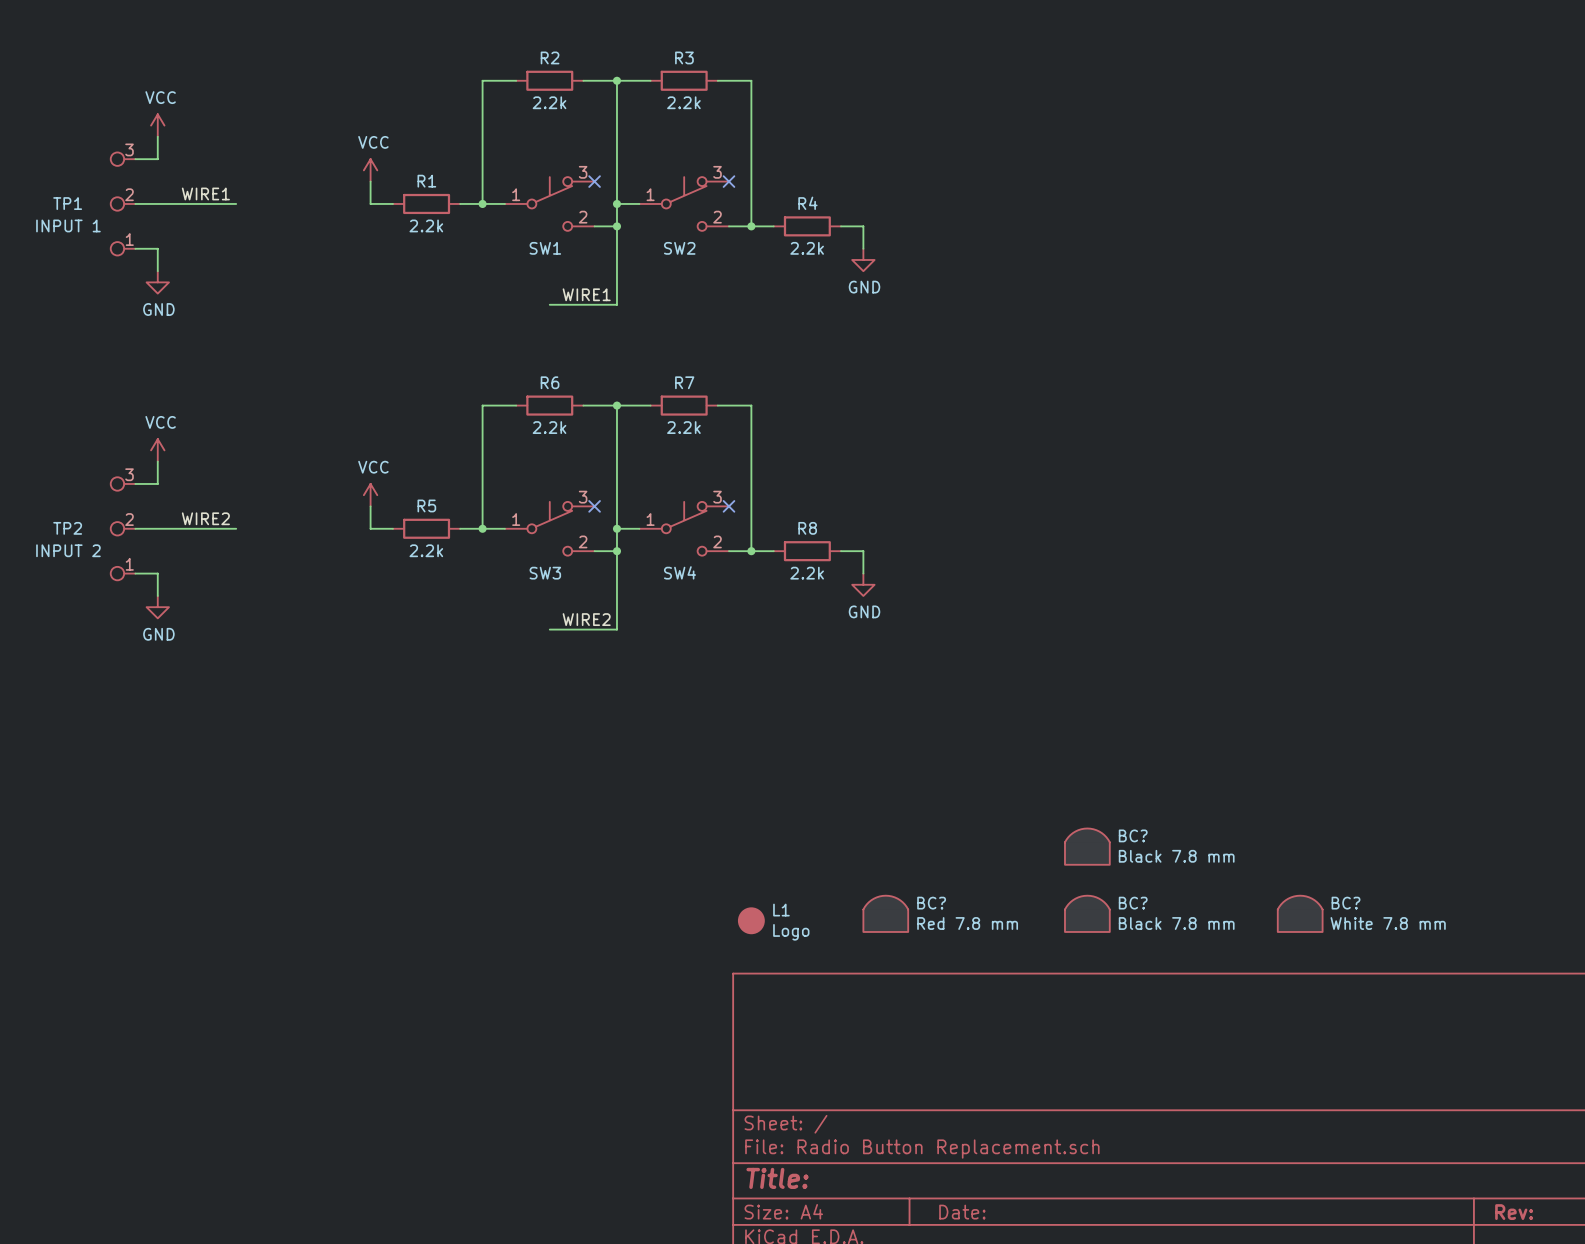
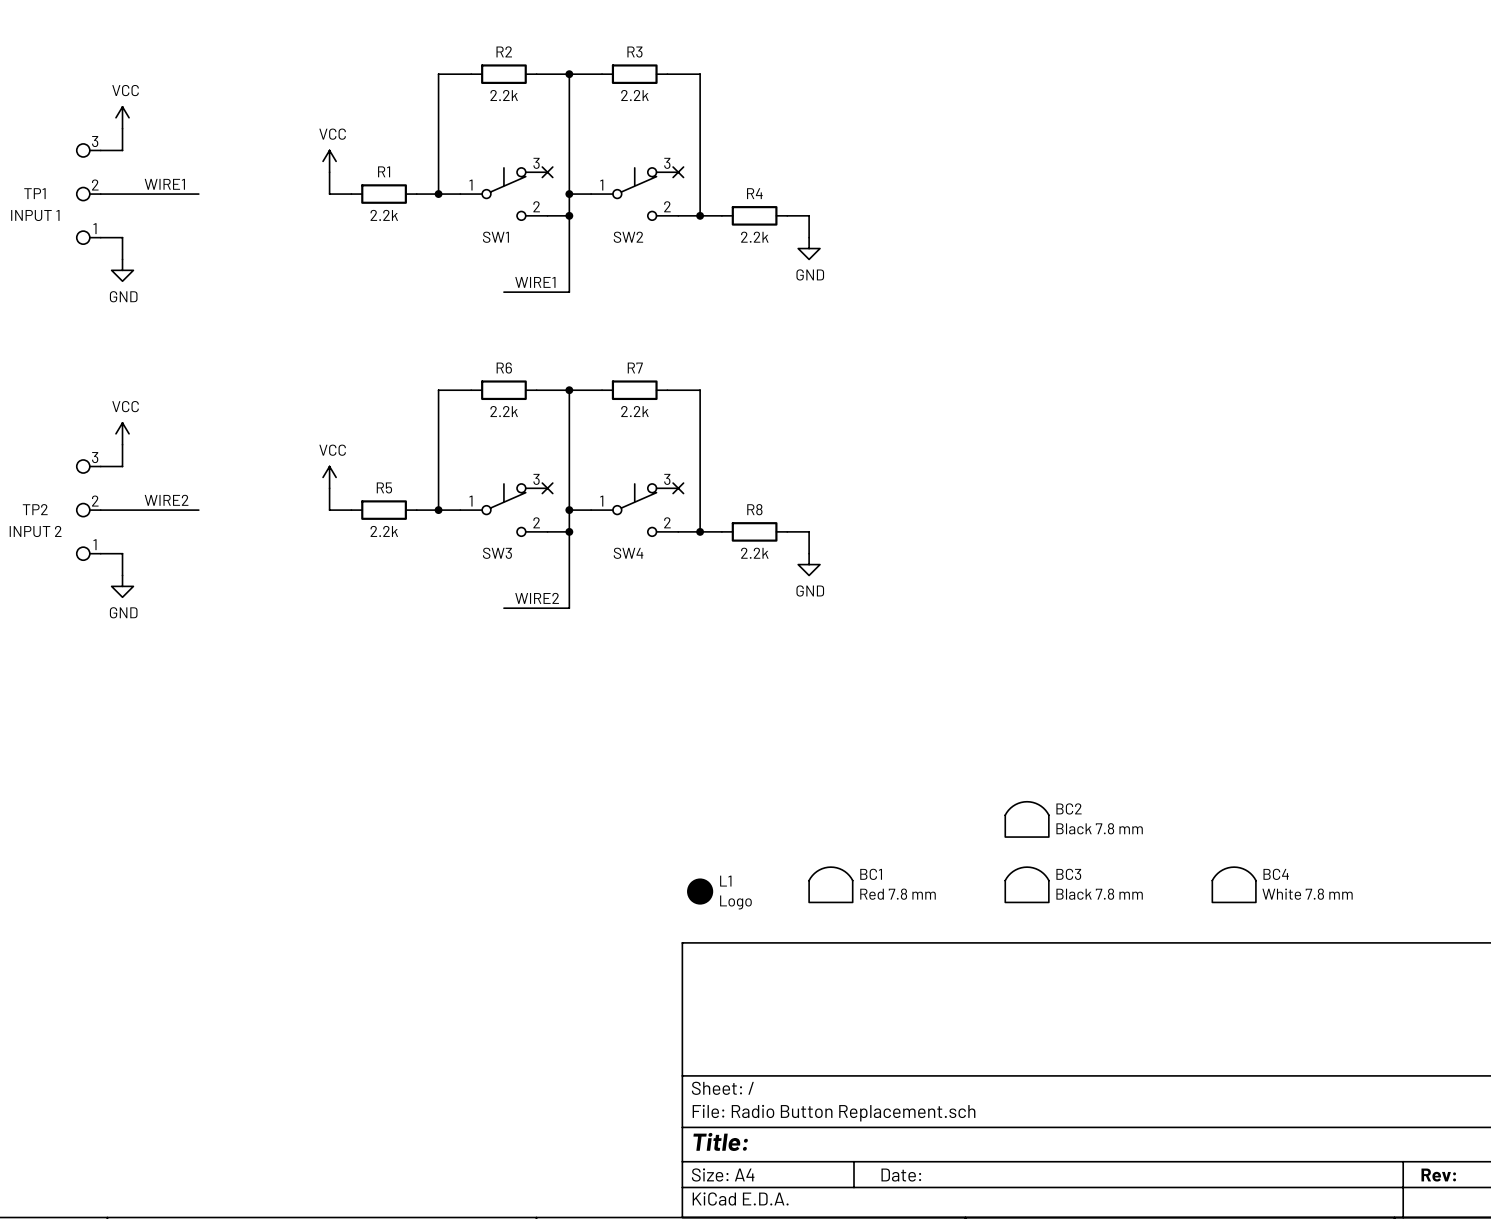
BC? name: BC? (1133, 835) -> BC2 (1069, 808)
BC? name: BC? (931, 903) -> BC1 (871, 874)
BC? name: BC? (1133, 903) -> BC3 (1068, 874)
BC? name: BC? (1346, 903) -> BC4 (1276, 874)

